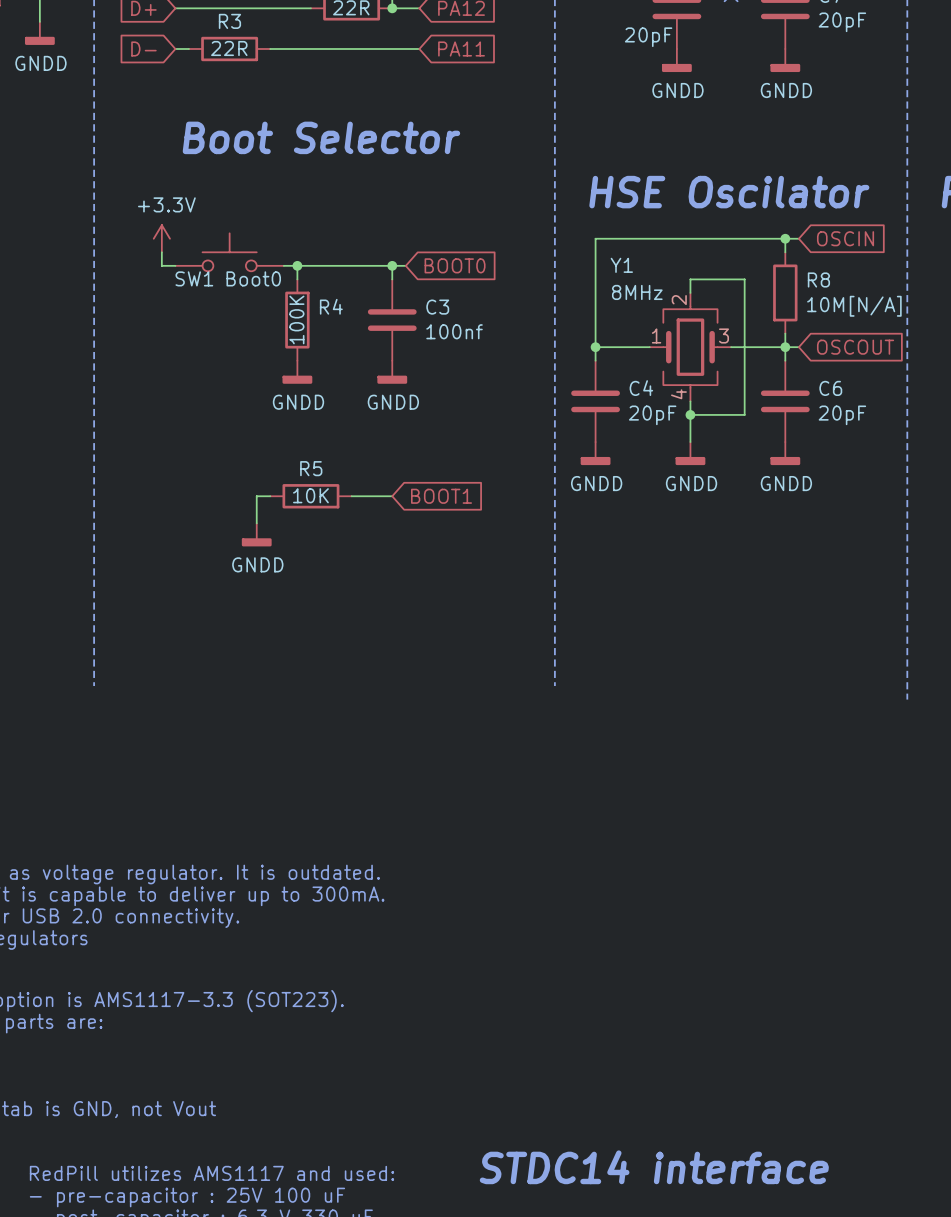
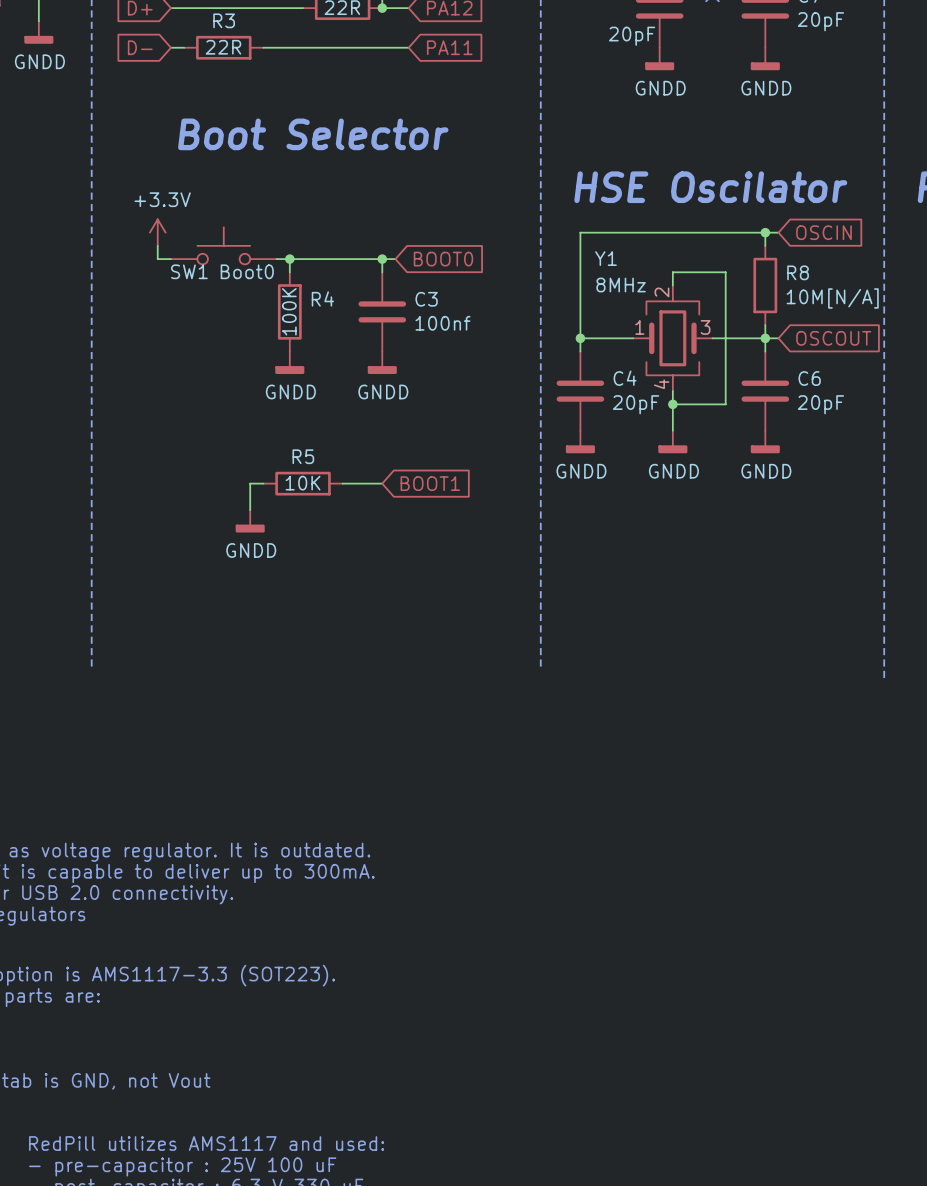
text: STDC14 interface (654, 1167) -> none

